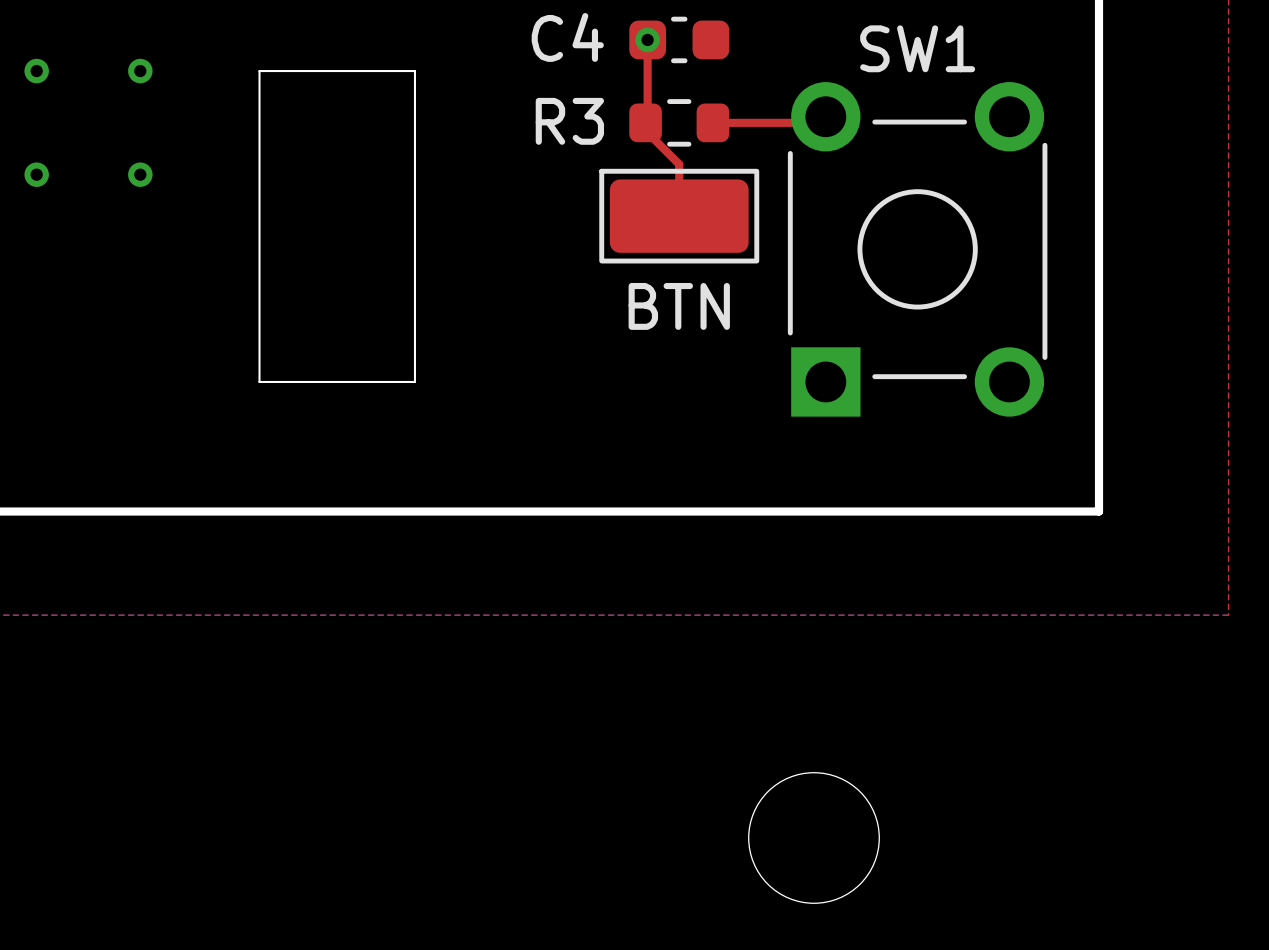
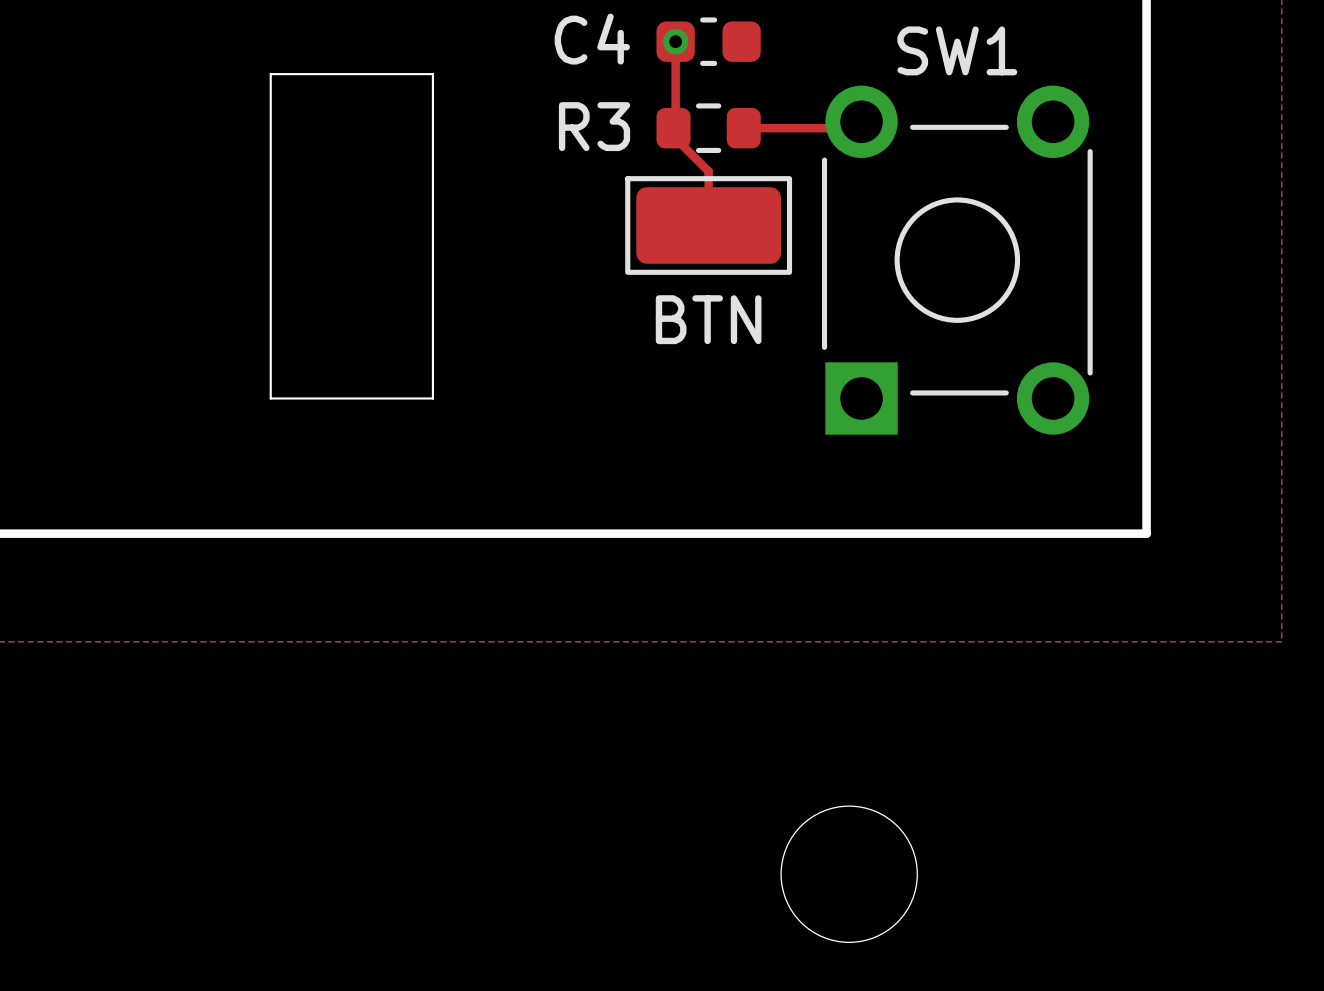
via: (36, 71) -> none
via: (140, 71) -> none
via: (36, 174) -> none
via: (140, 174) -> none

